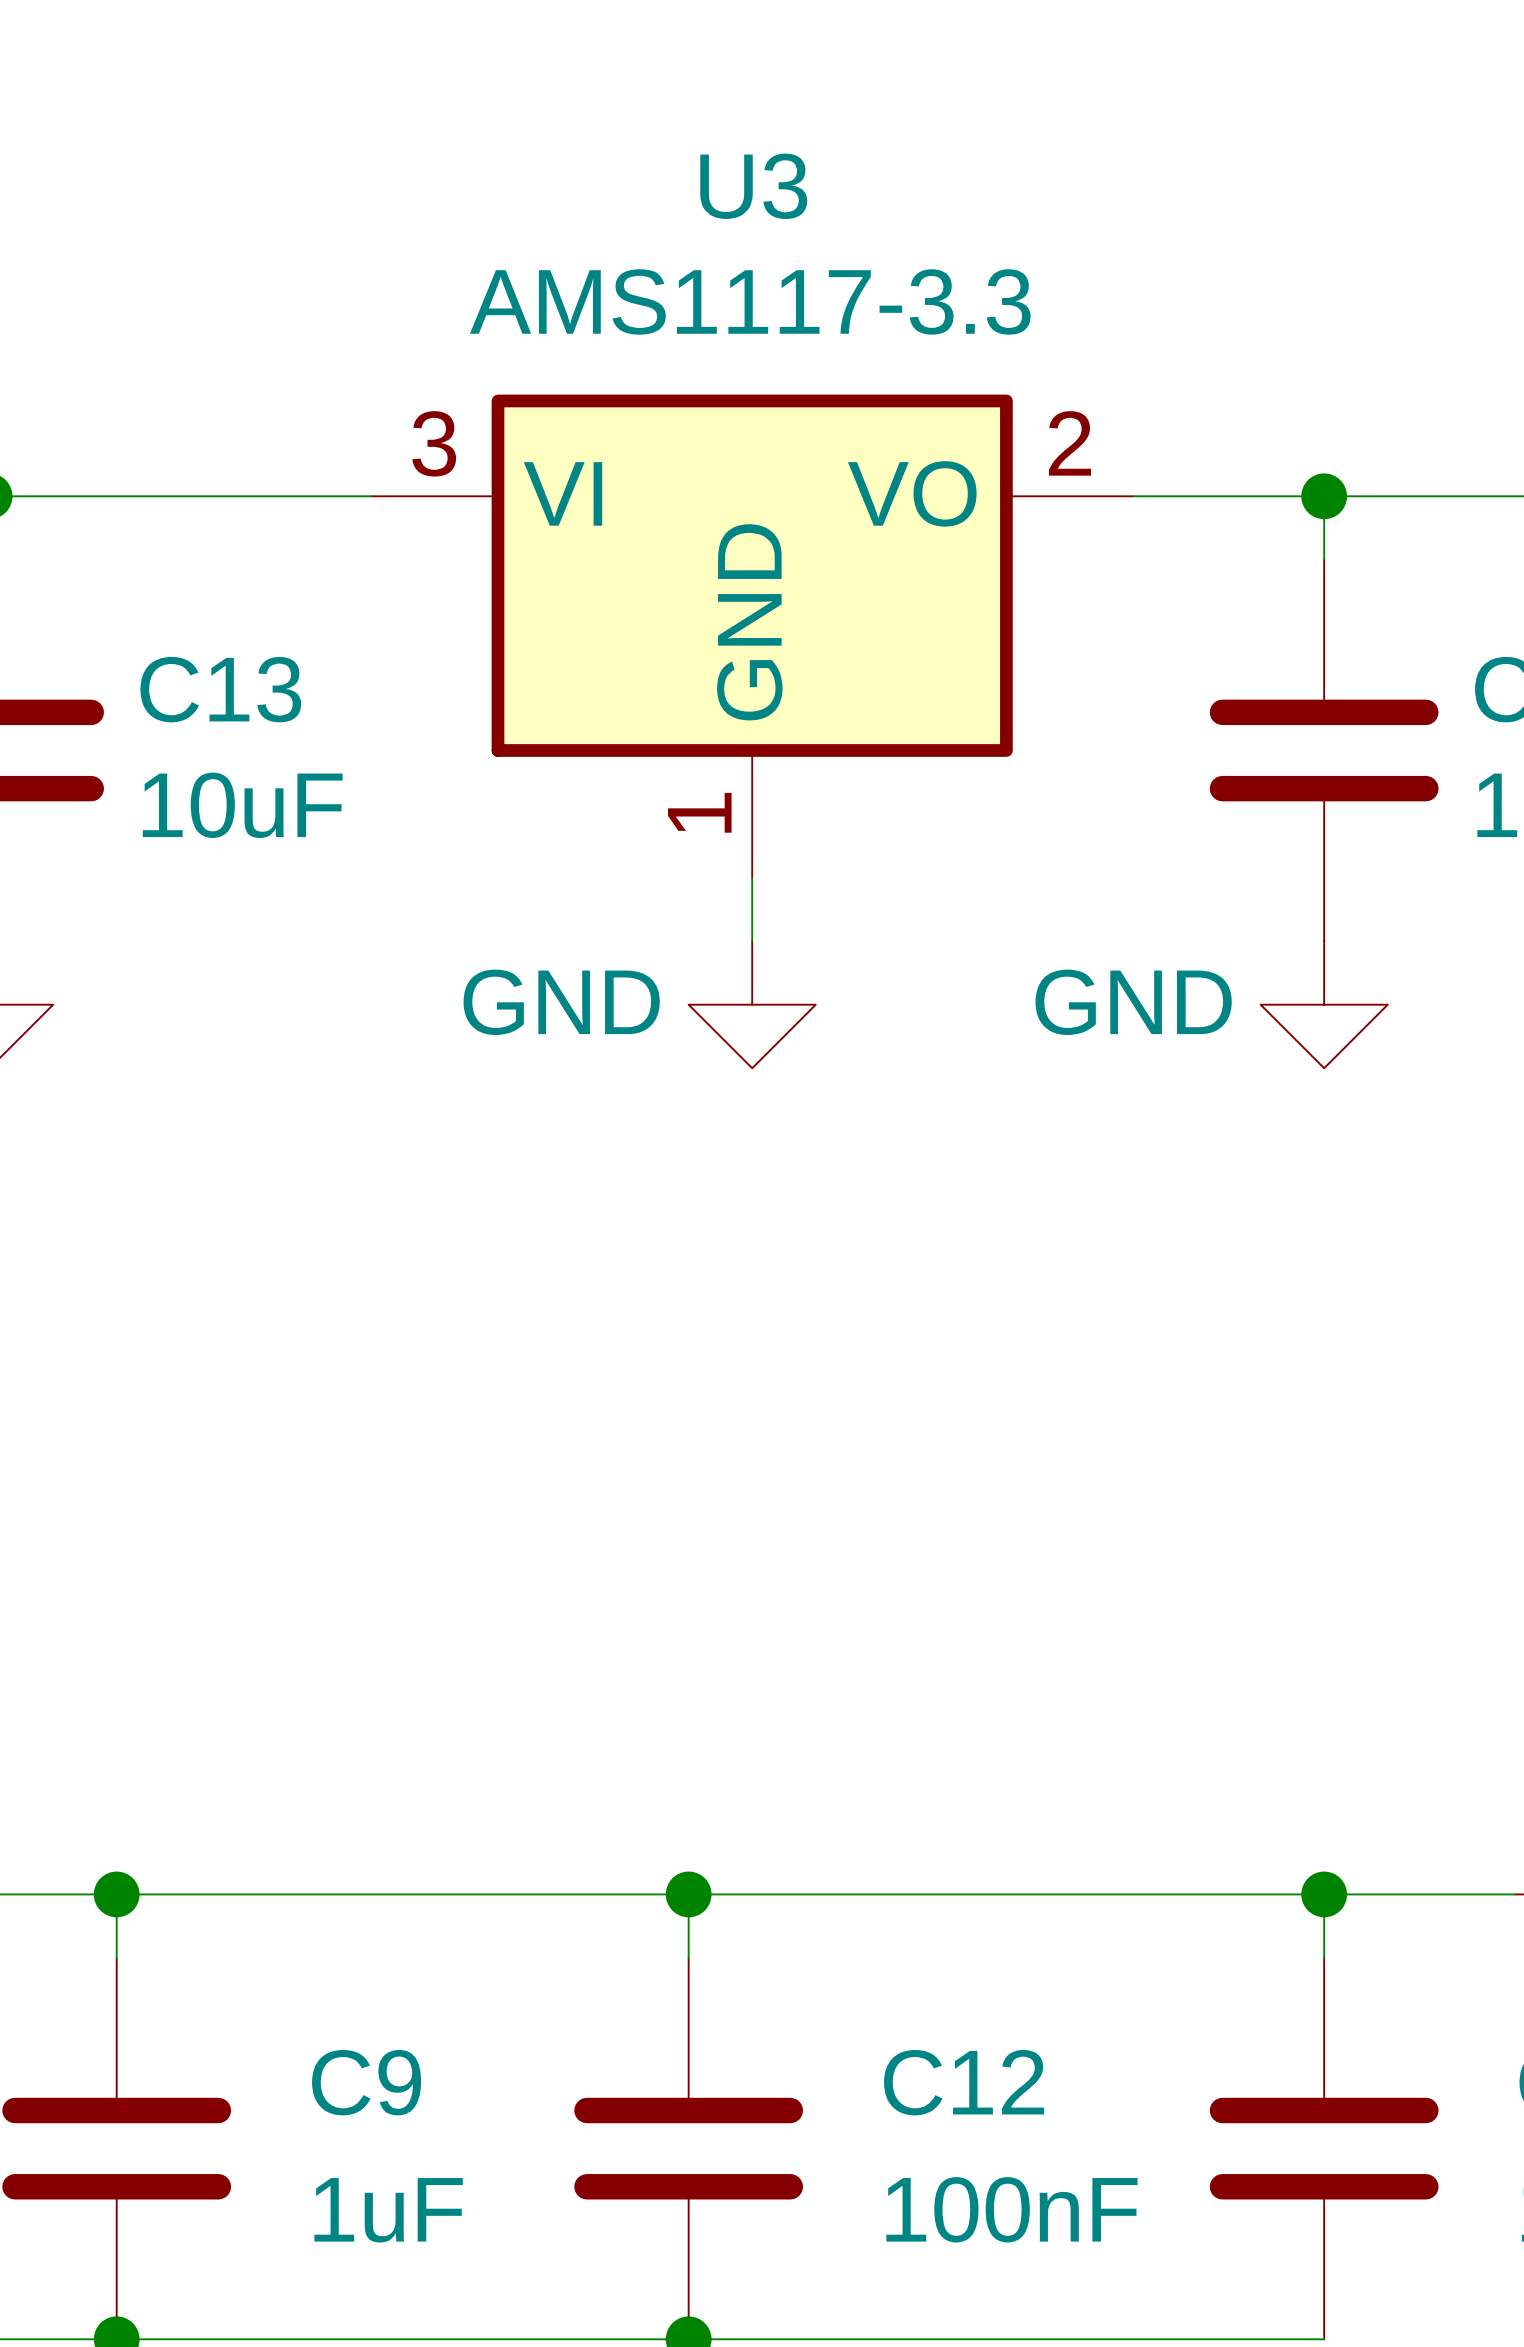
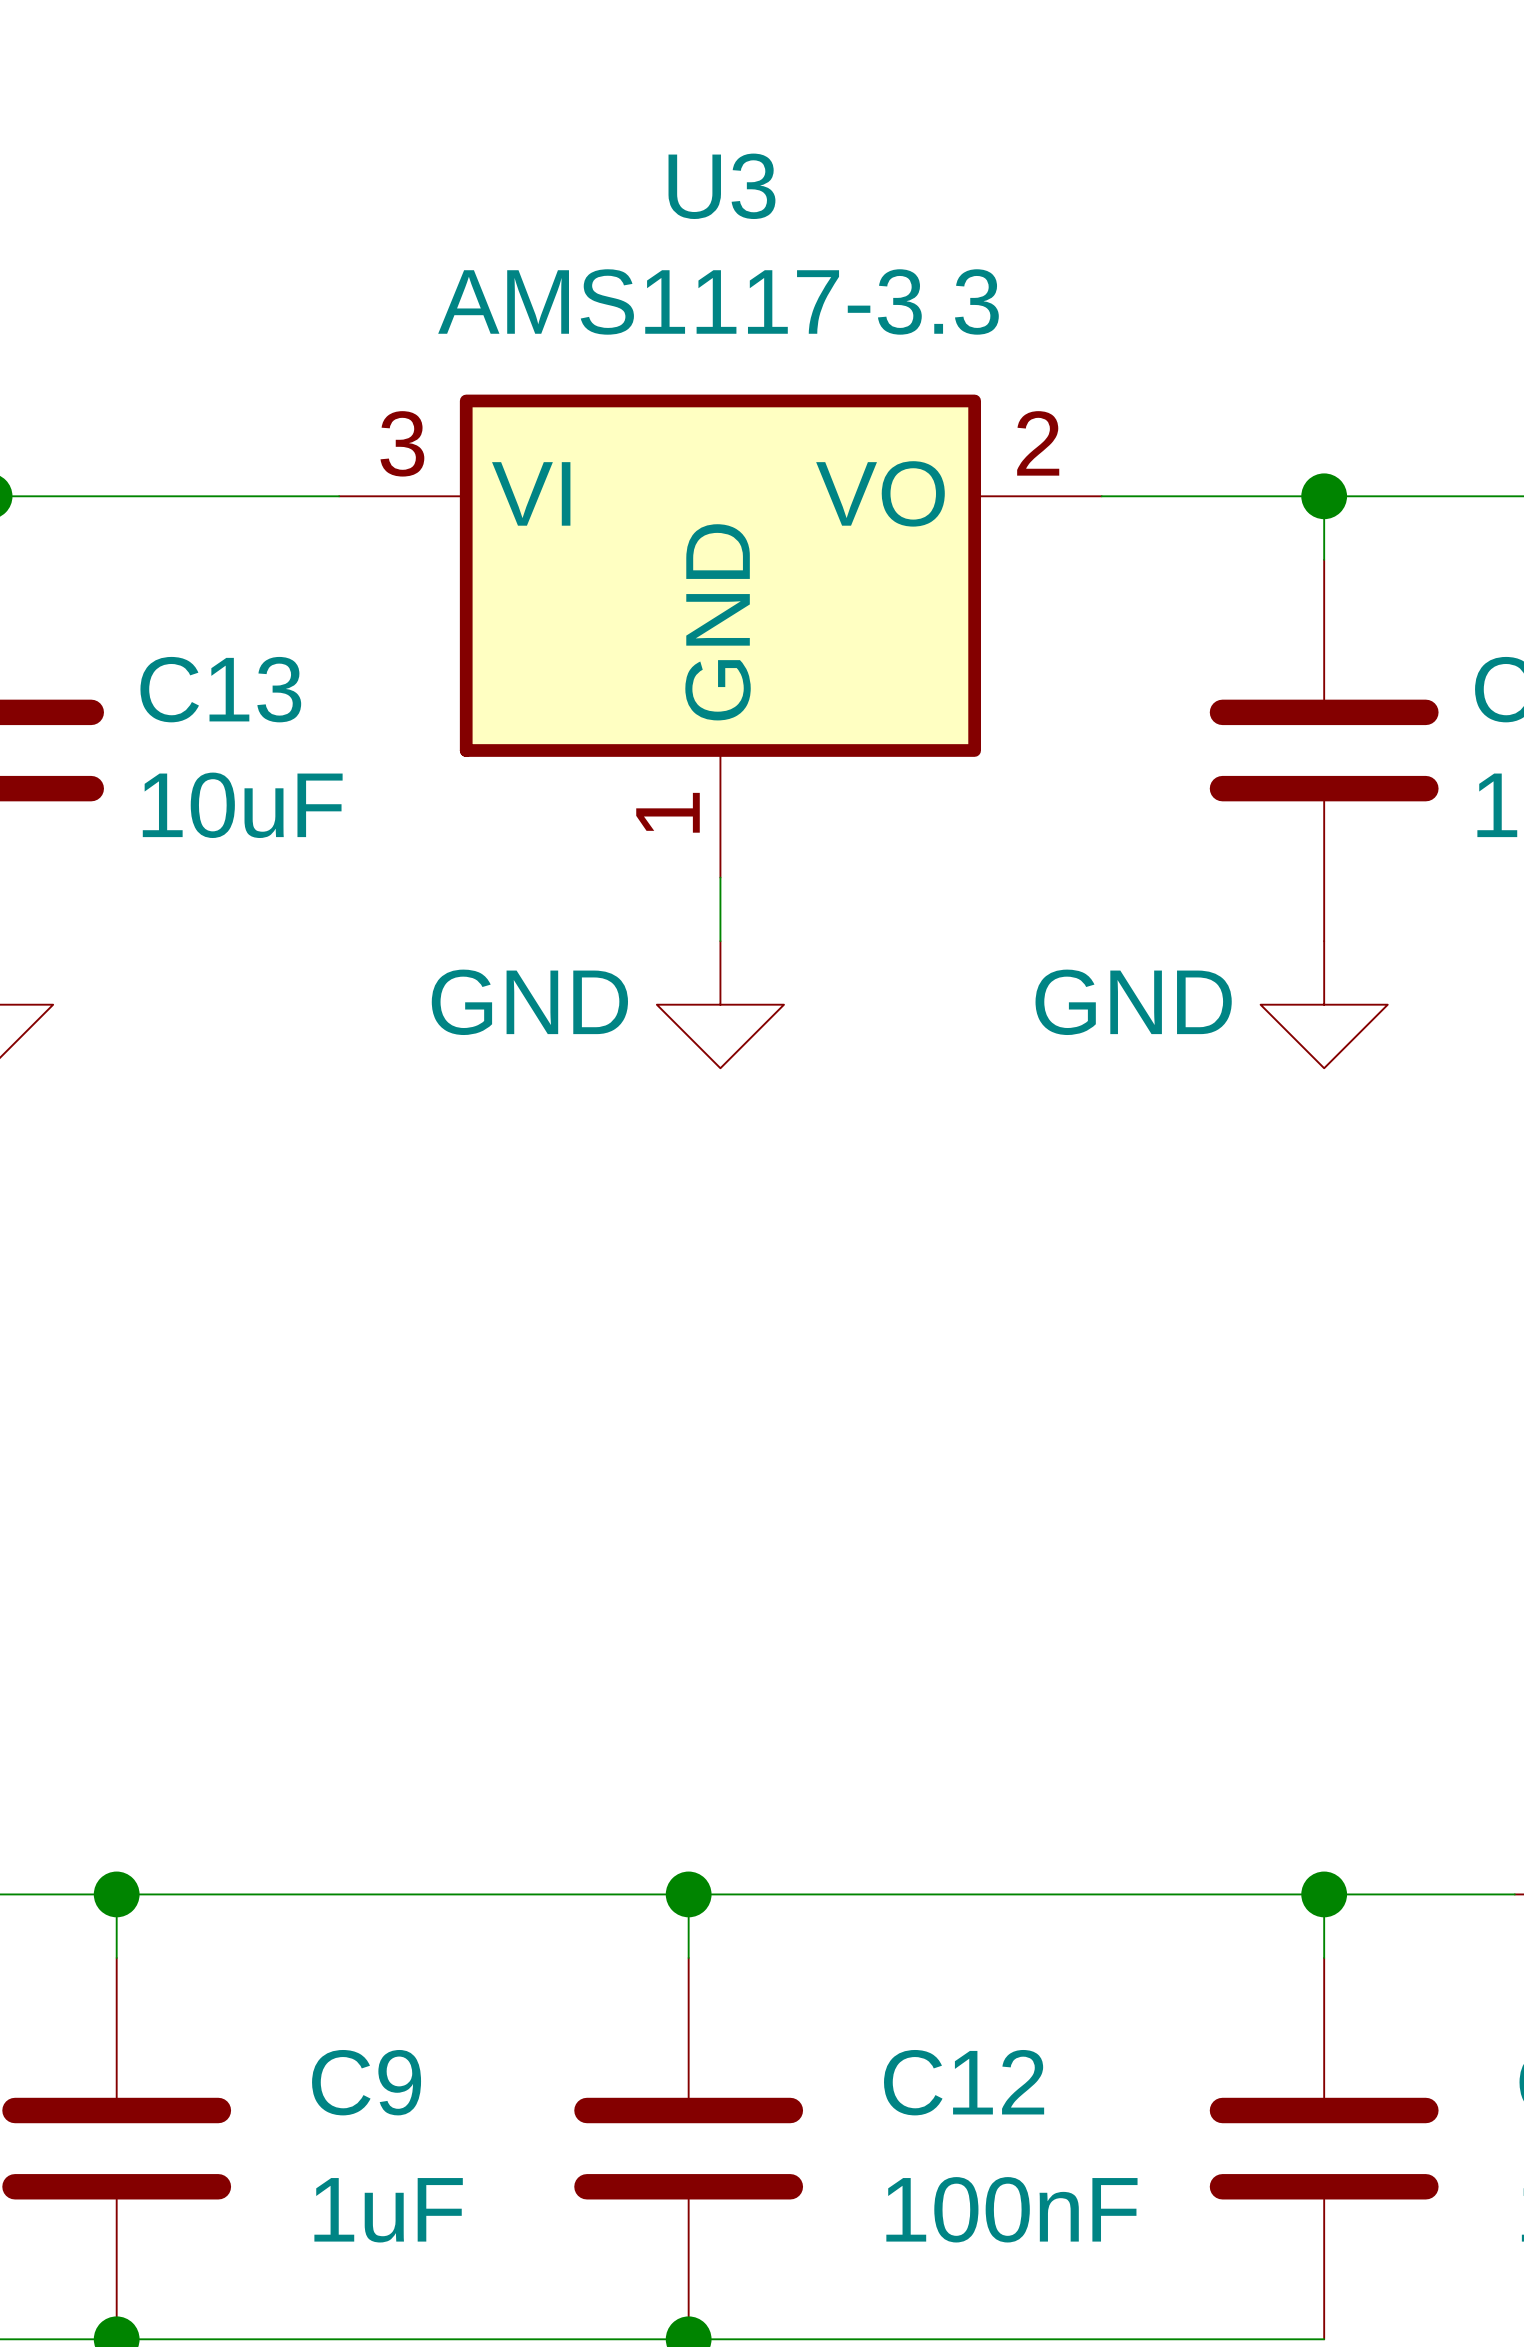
U3 position: (752, 636) -> (720, 636)
wire: (752, 877) (752, 941) -> (720, 877) (720, 941)
power symbol position: GND (752, 1004) -> GND (720, 1004)

